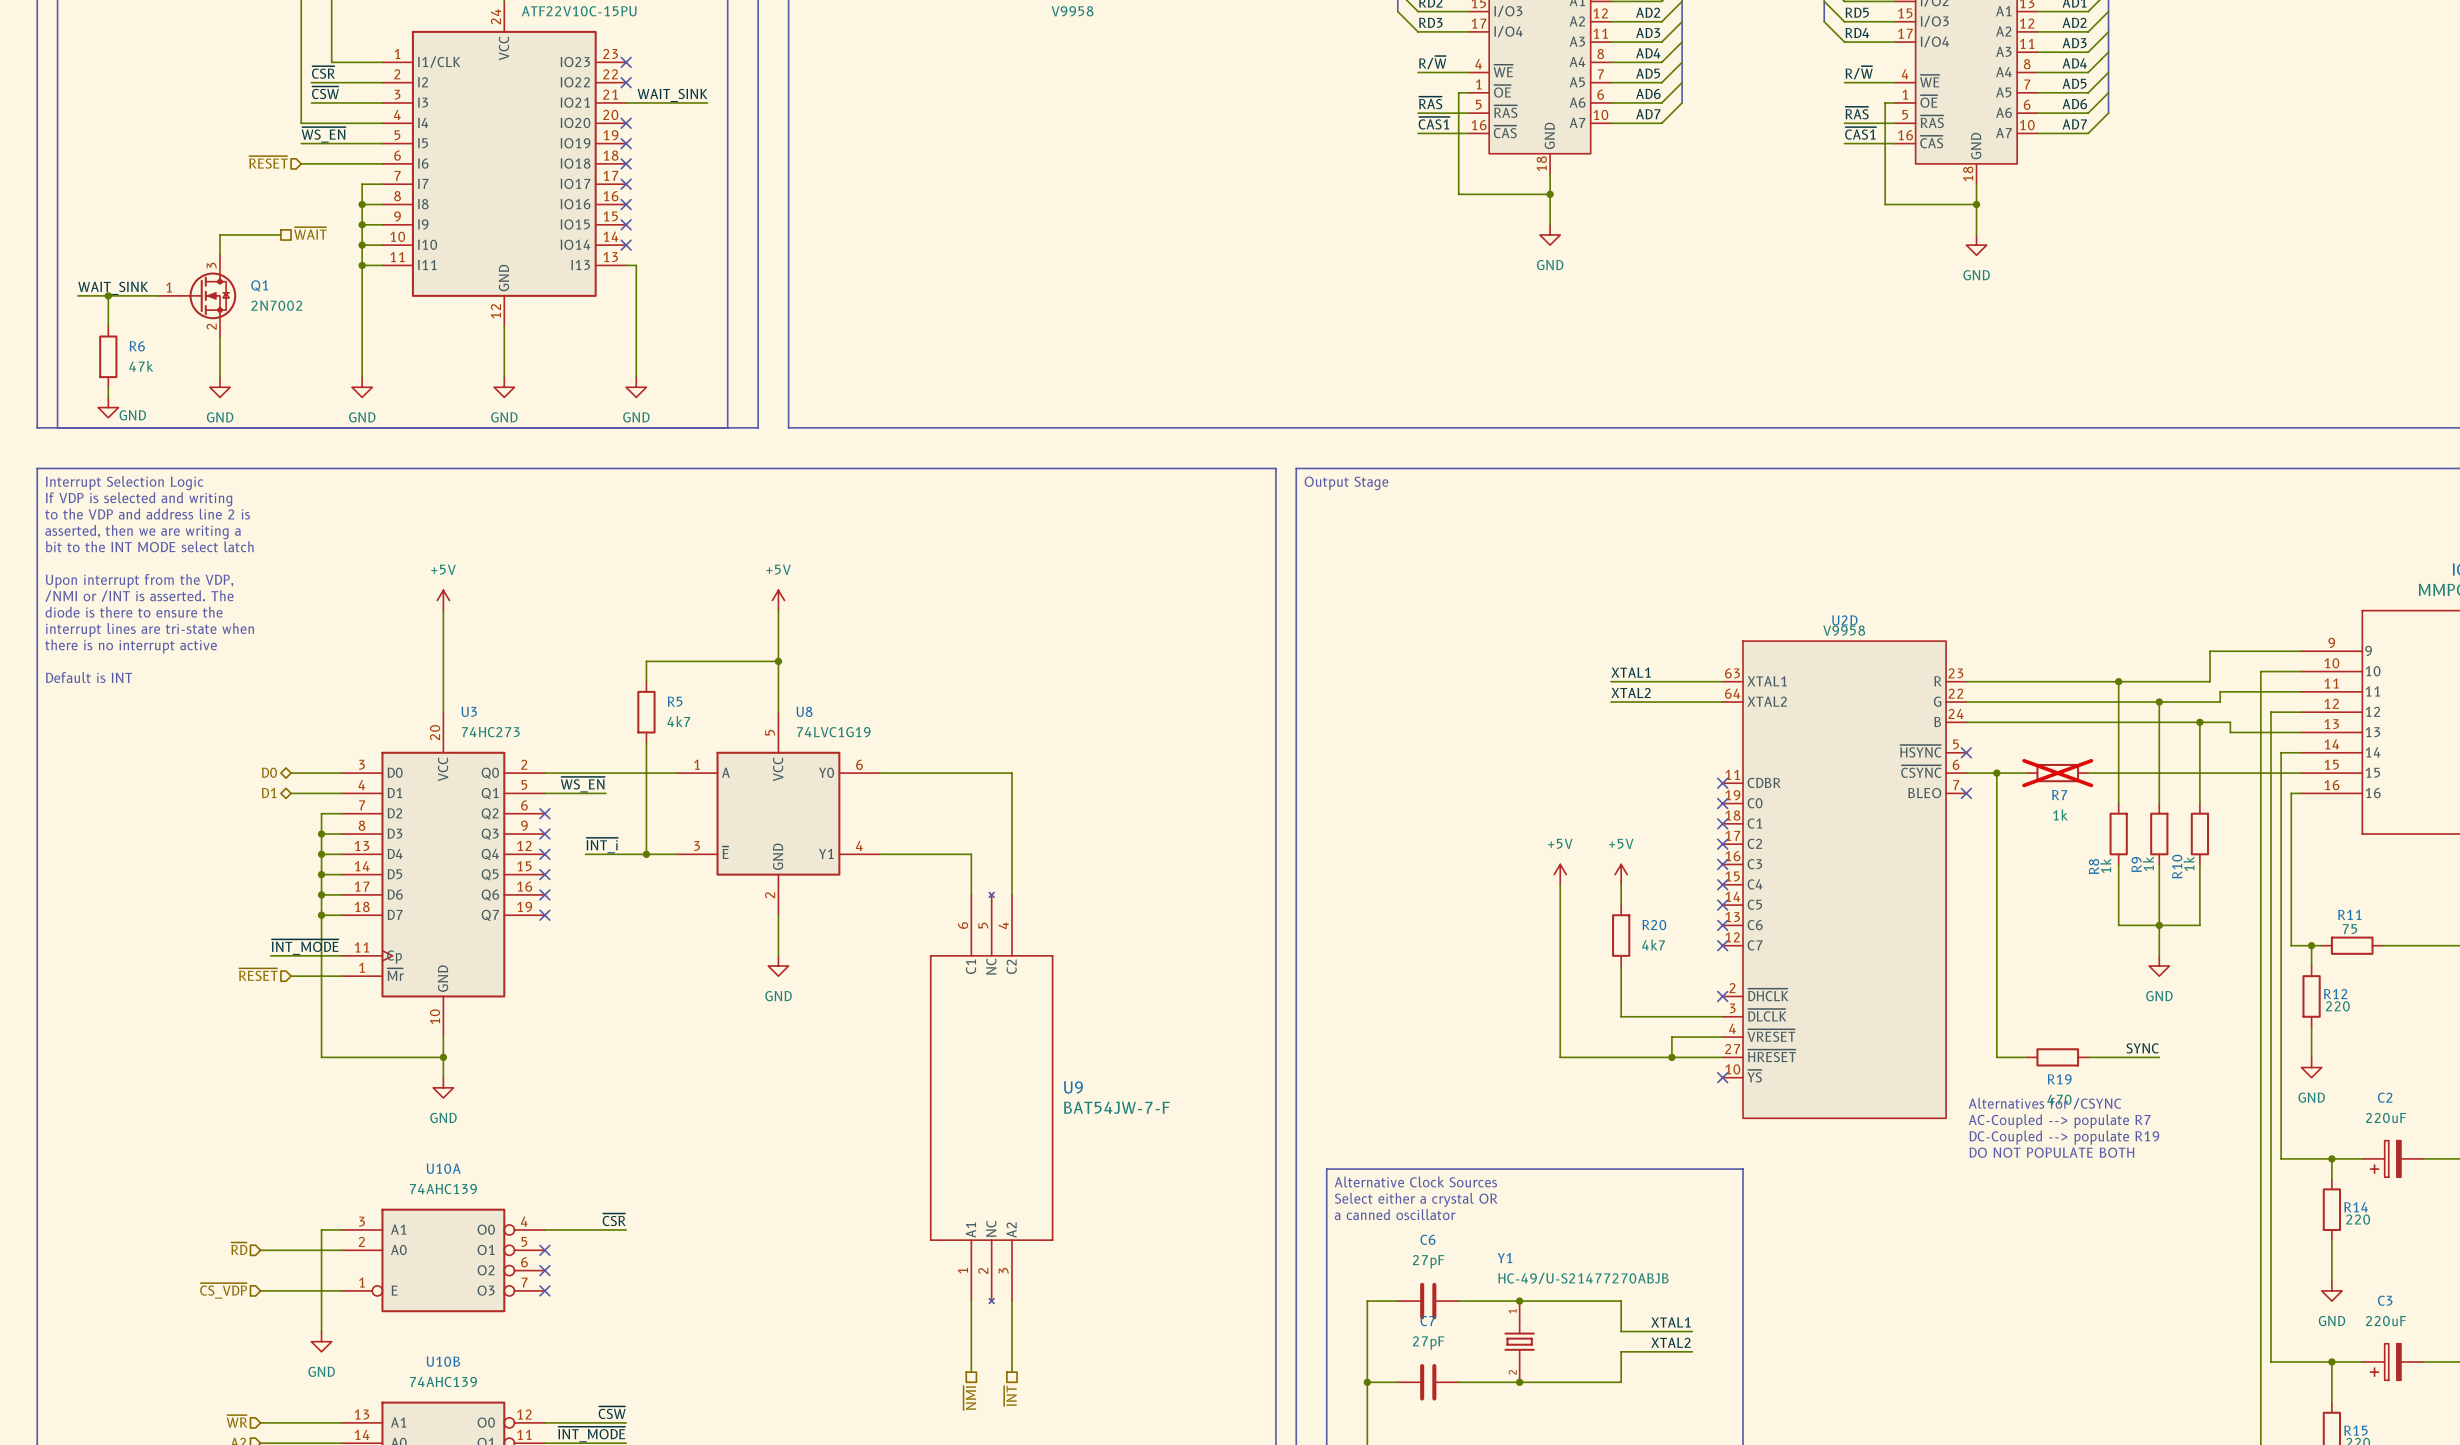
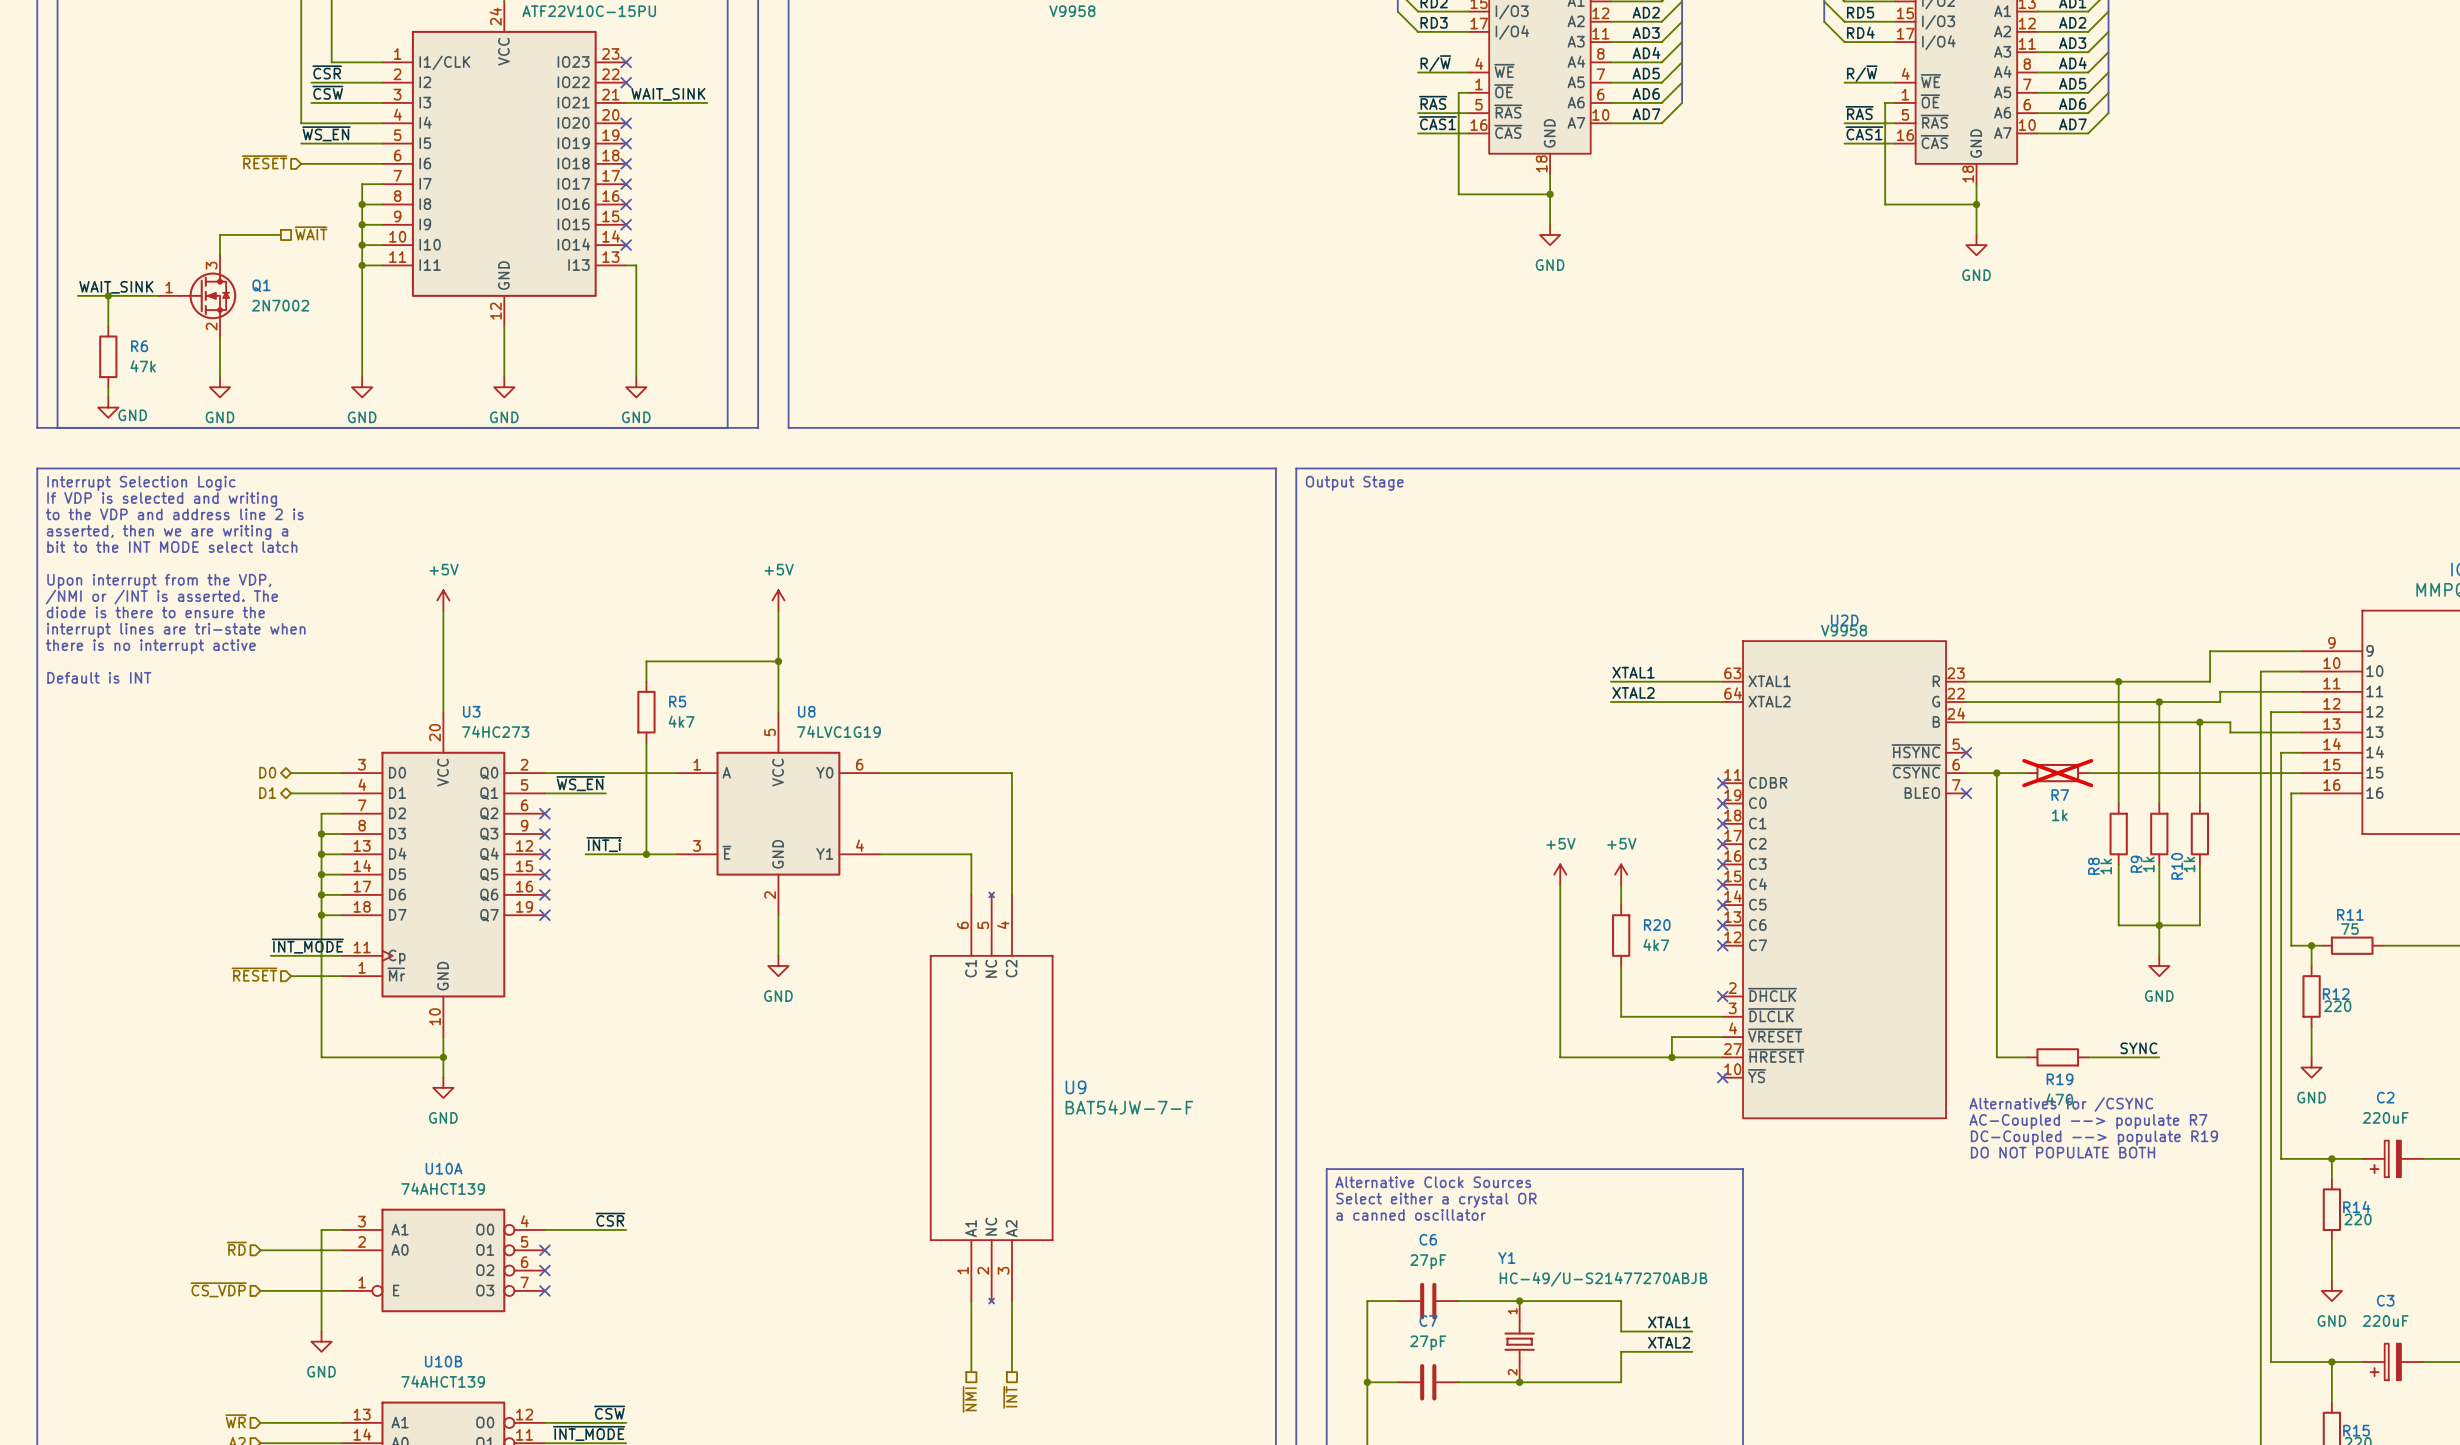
U10A value: 74AHC139 (443, 1189) -> 74AHCT139 (443, 1188)
U10B value: 74AHC139 (443, 1381) -> 74AHCT139 (443, 1381)

